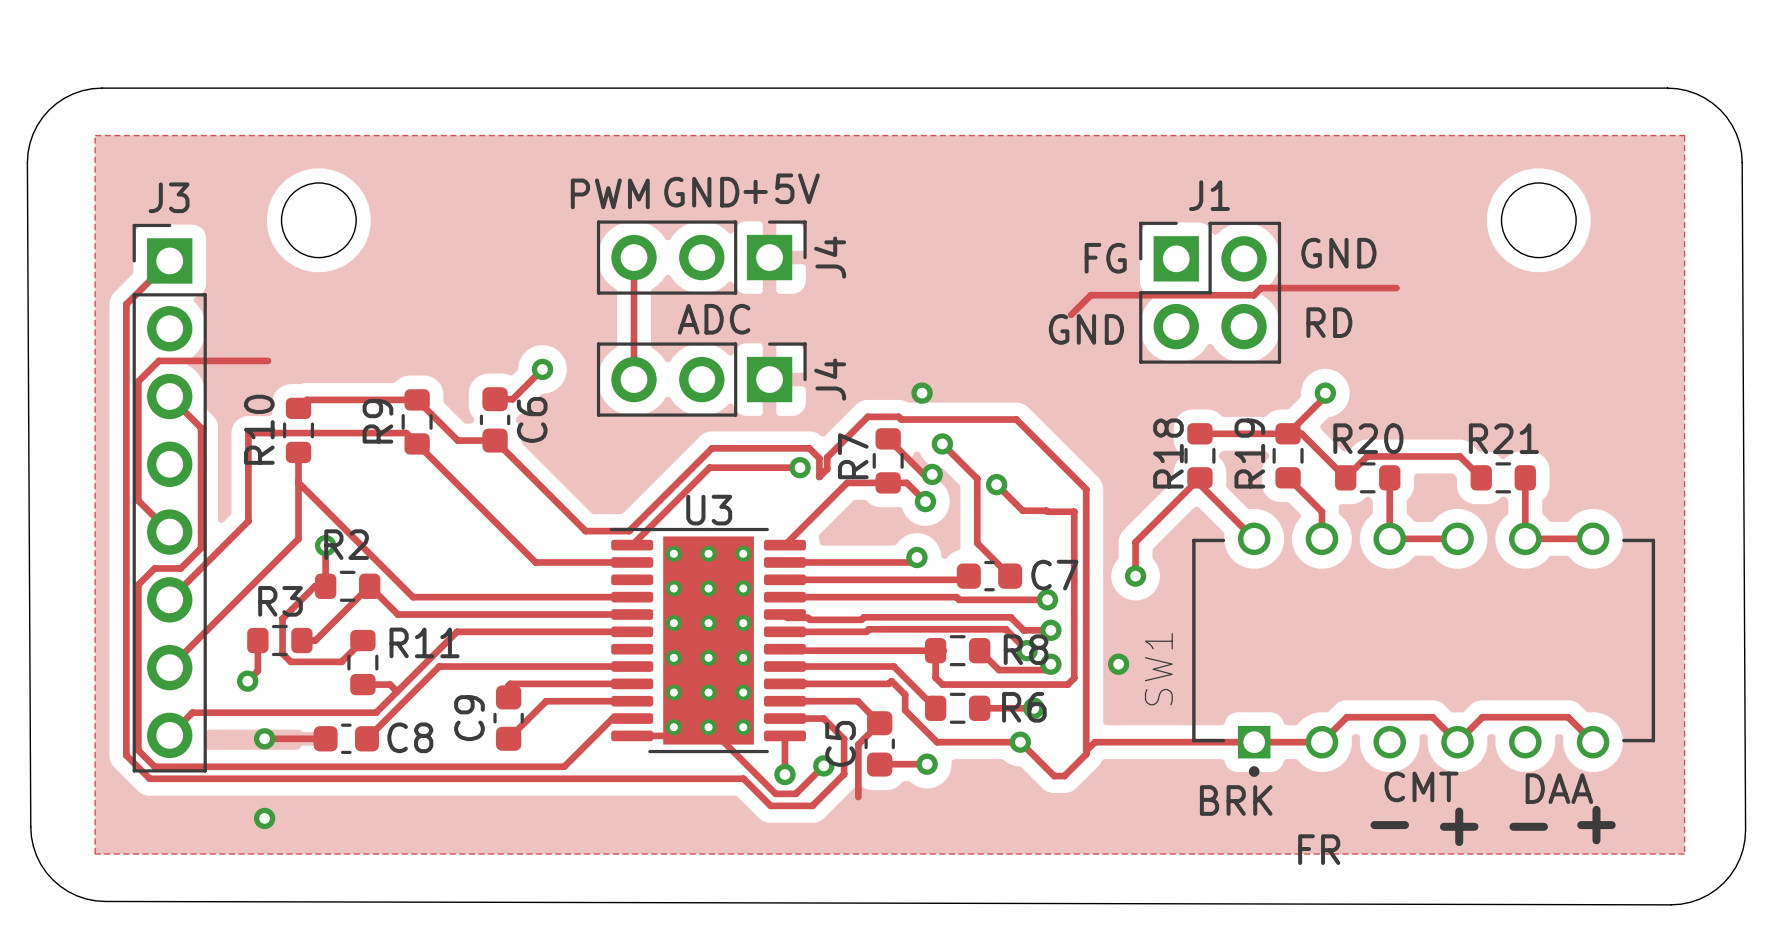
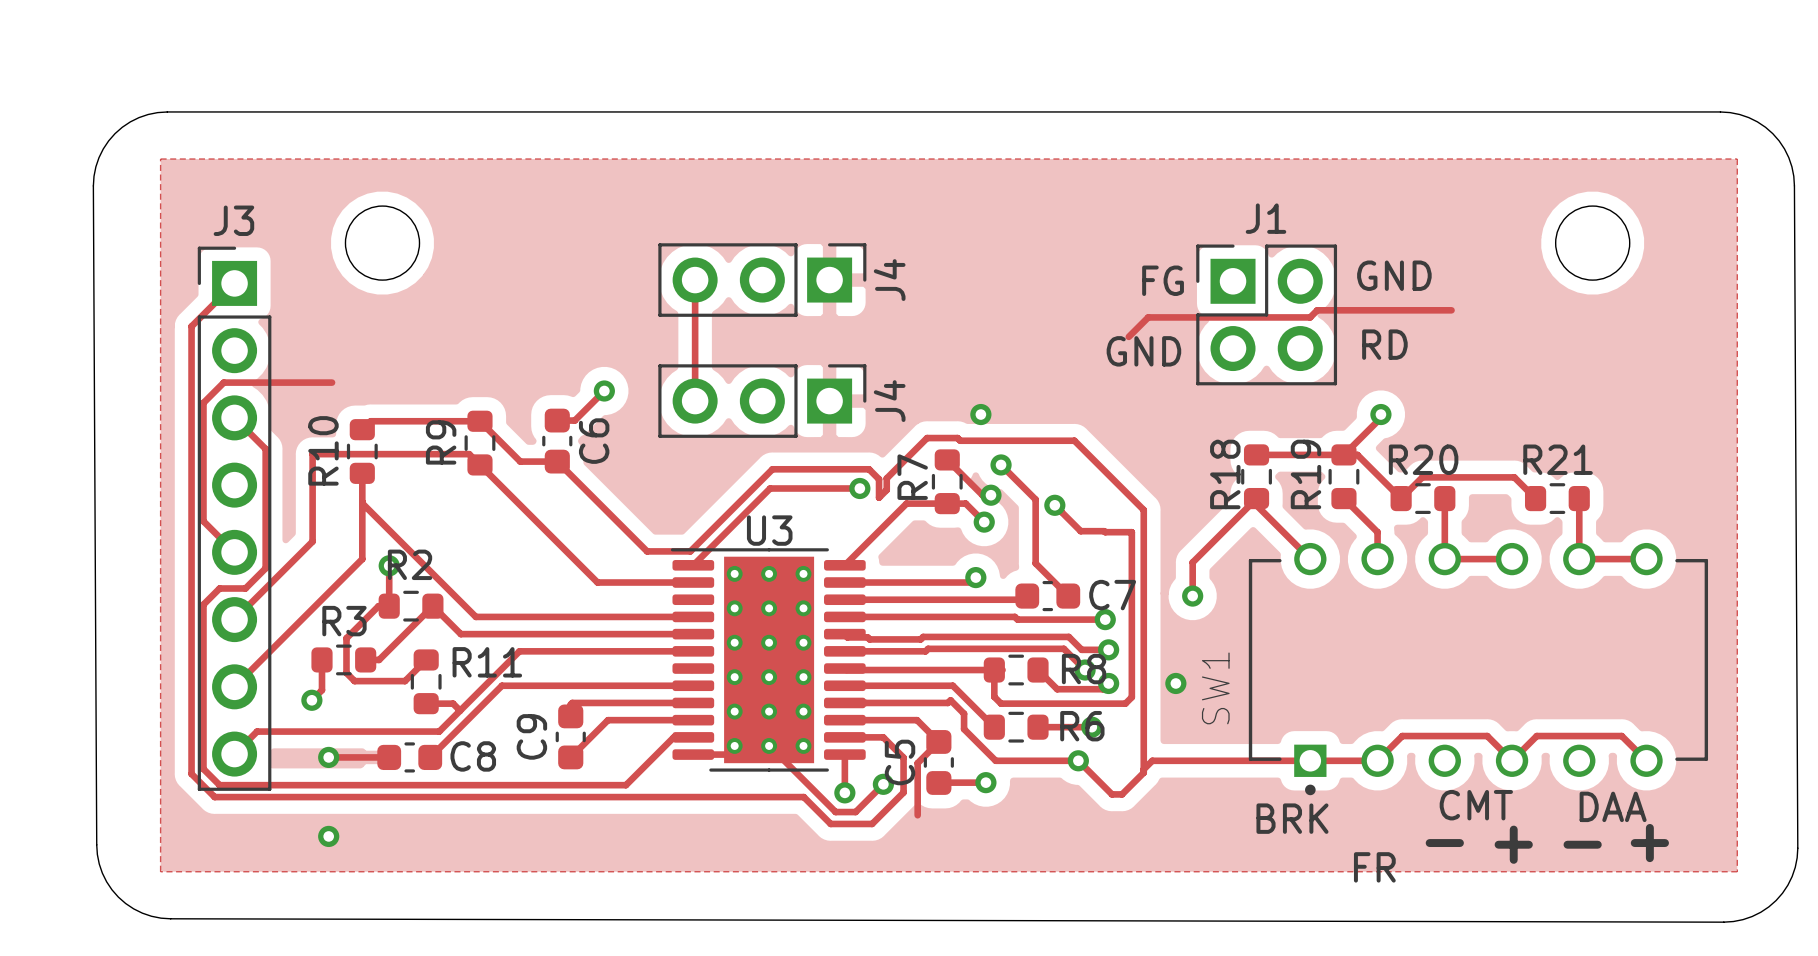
text: +5V (781, 188) -> none
text: GND (701, 192) -> none
text: PWM (610, 193) -> none
text: ADC (714, 319) -> none

